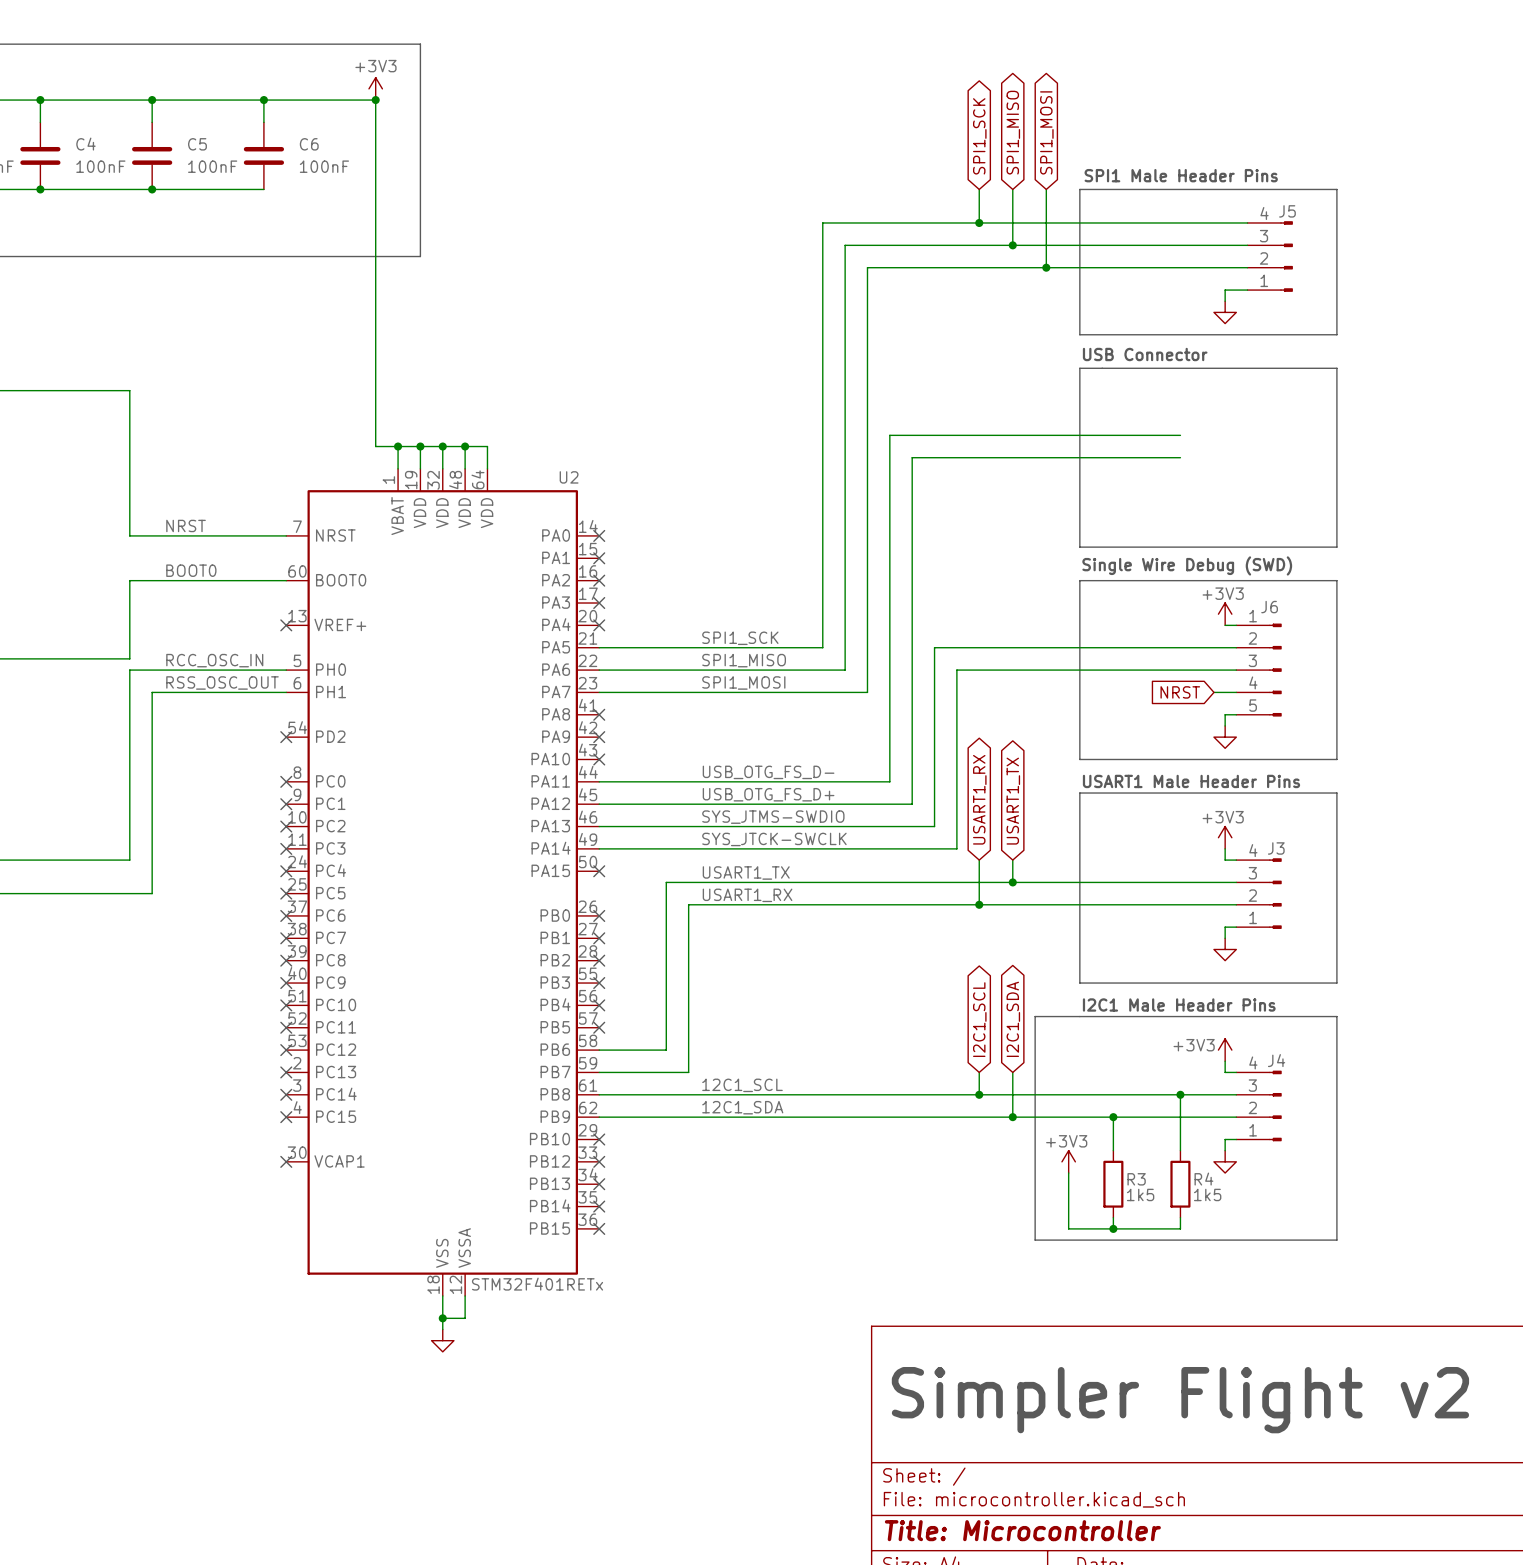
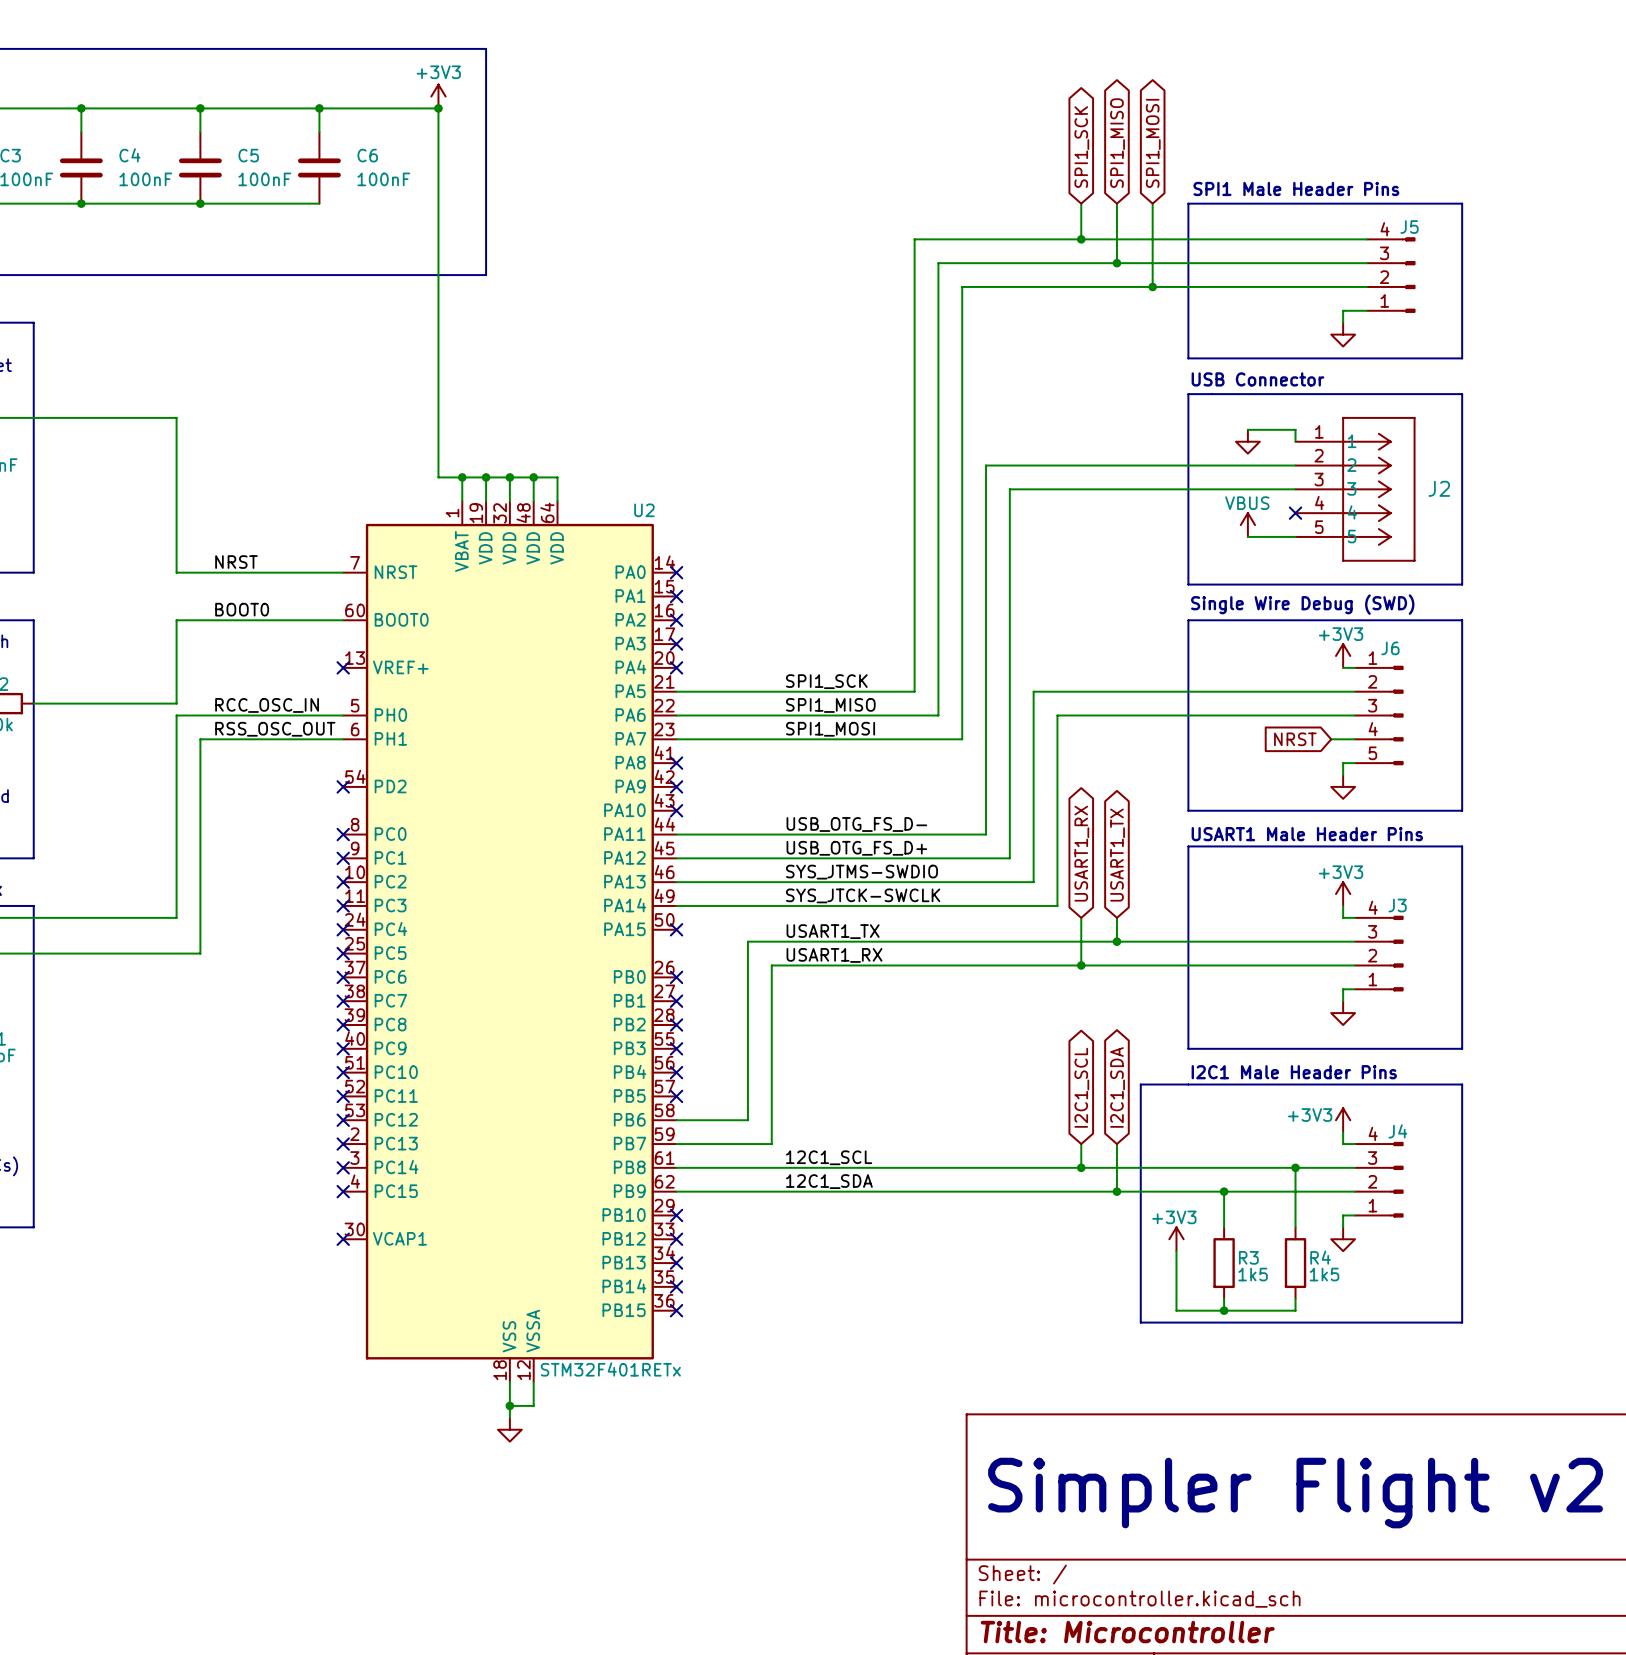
wire: none -> (1247, 429) (1295, 429) (1295, 441)
power symbol: none -> (1247, 441)
J2: none -> (1355, 489)
no-connect mark: none -> (1295, 513)
power symbol: none -> VBUS (1247, 525)
wire: none -> (1247, 536) (1295, 536)

